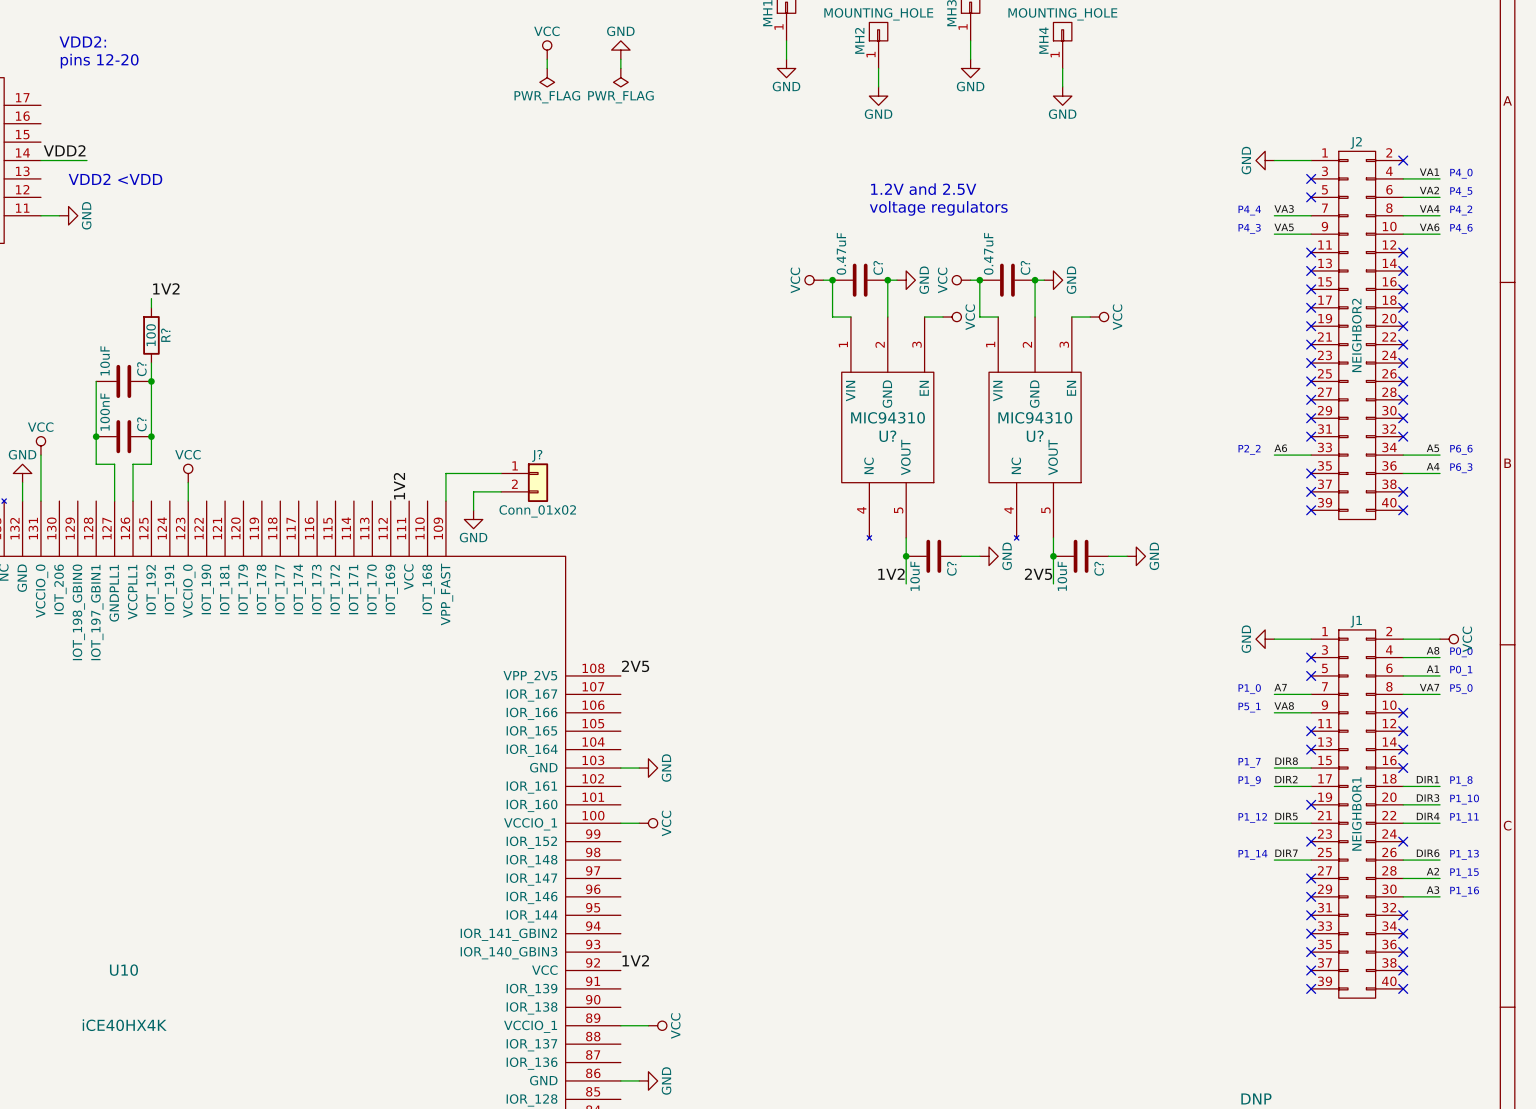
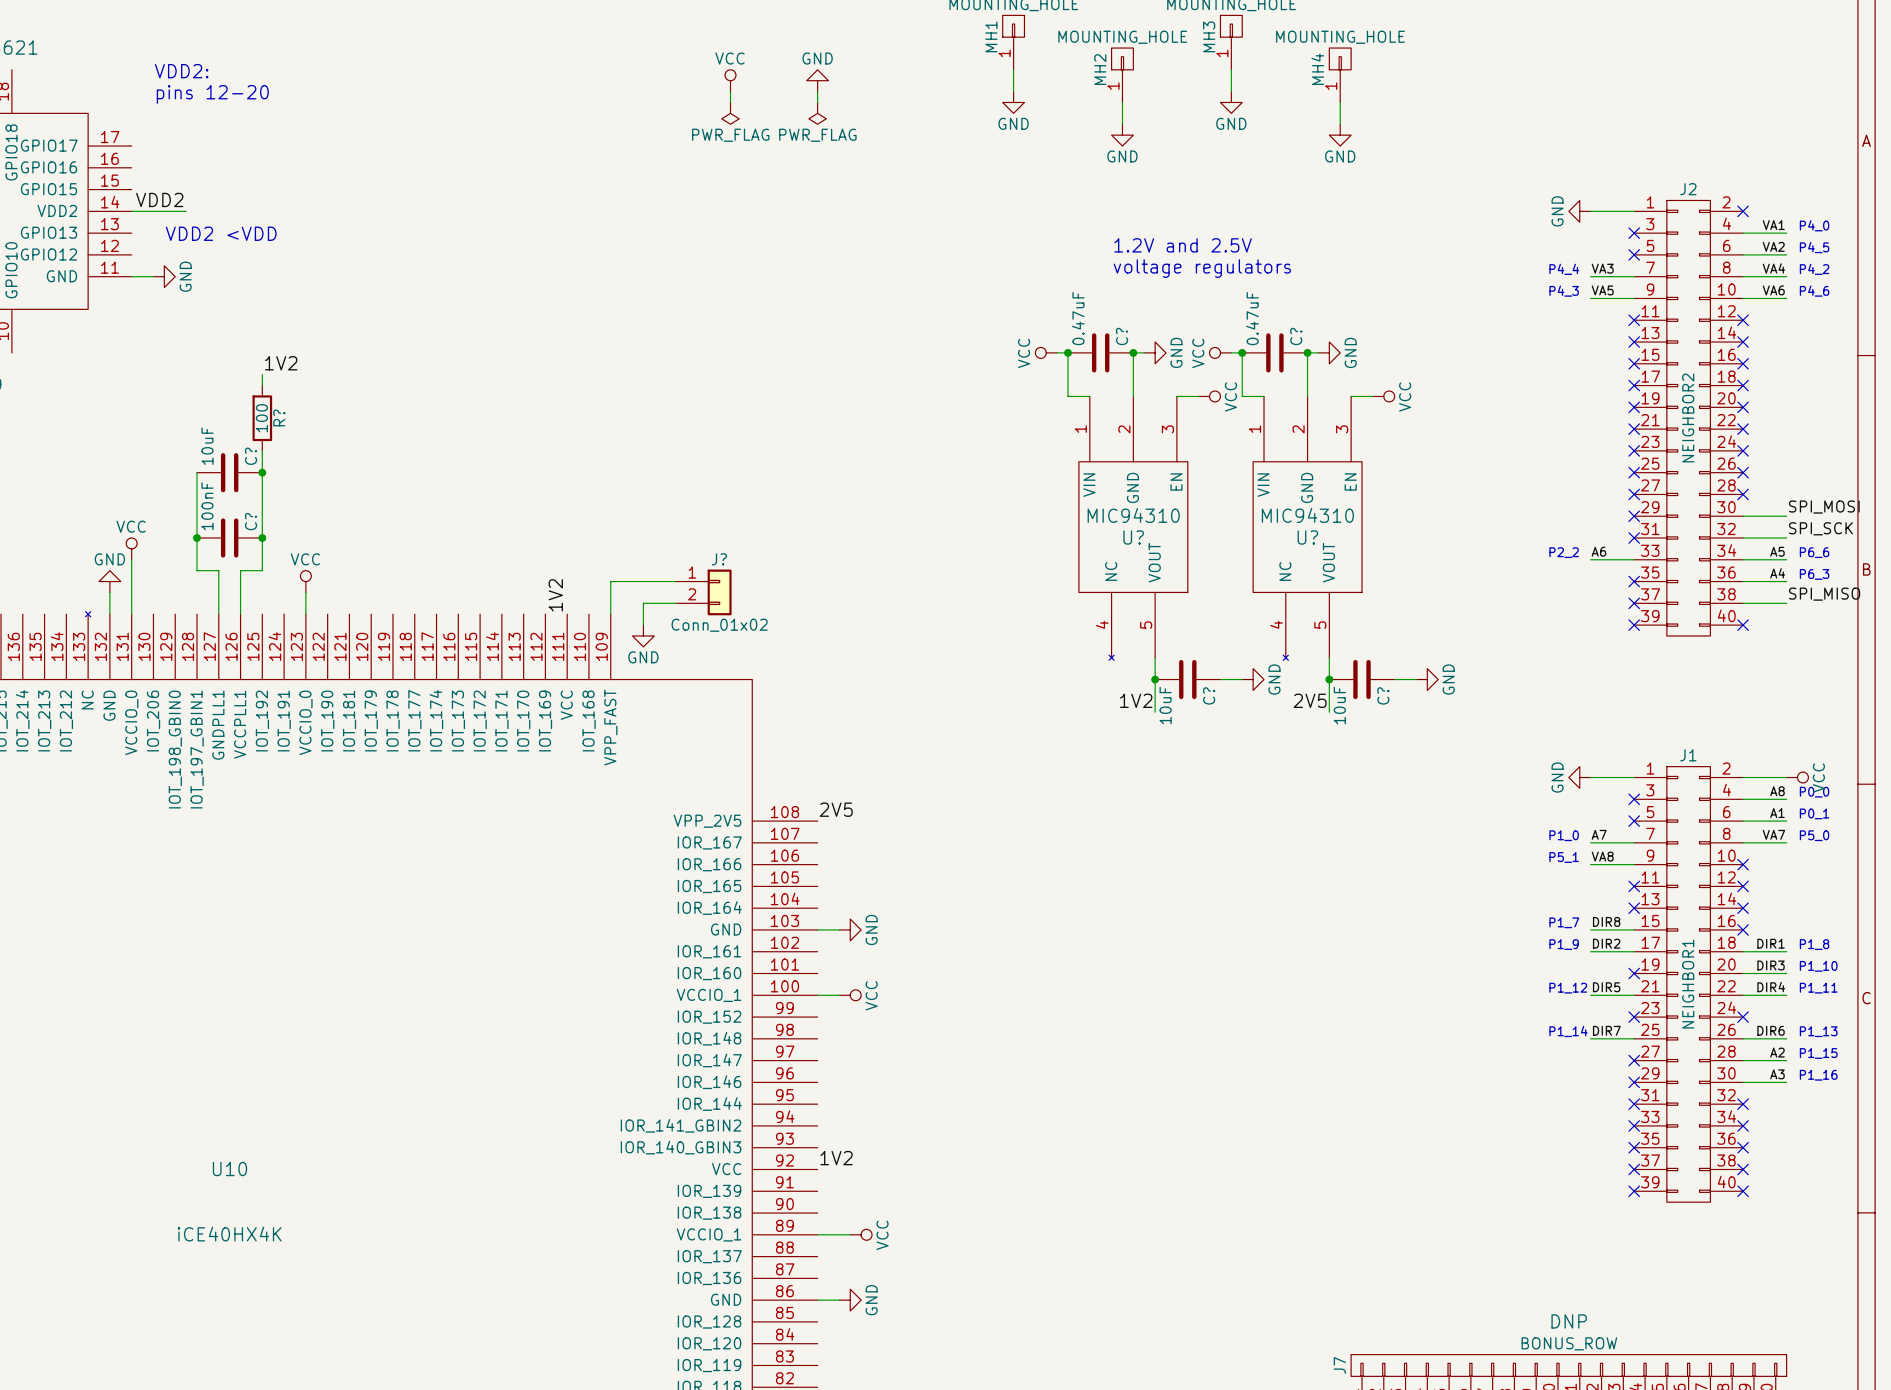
label: none -> SPI_MOSI (1824, 507)
wire: none -> (1743, 516) (1786, 516)
no-connect mark: (1403, 418) -> none
label: none -> SPI_SCK (1820, 528)
wire: none -> (1743, 538) (1786, 538)
no-connect mark: (1403, 436) -> none
label: none -> SPI_MISO (1824, 594)
wire: none -> (1743, 603) (1786, 603)
no-connect mark: (1403, 491) -> none

